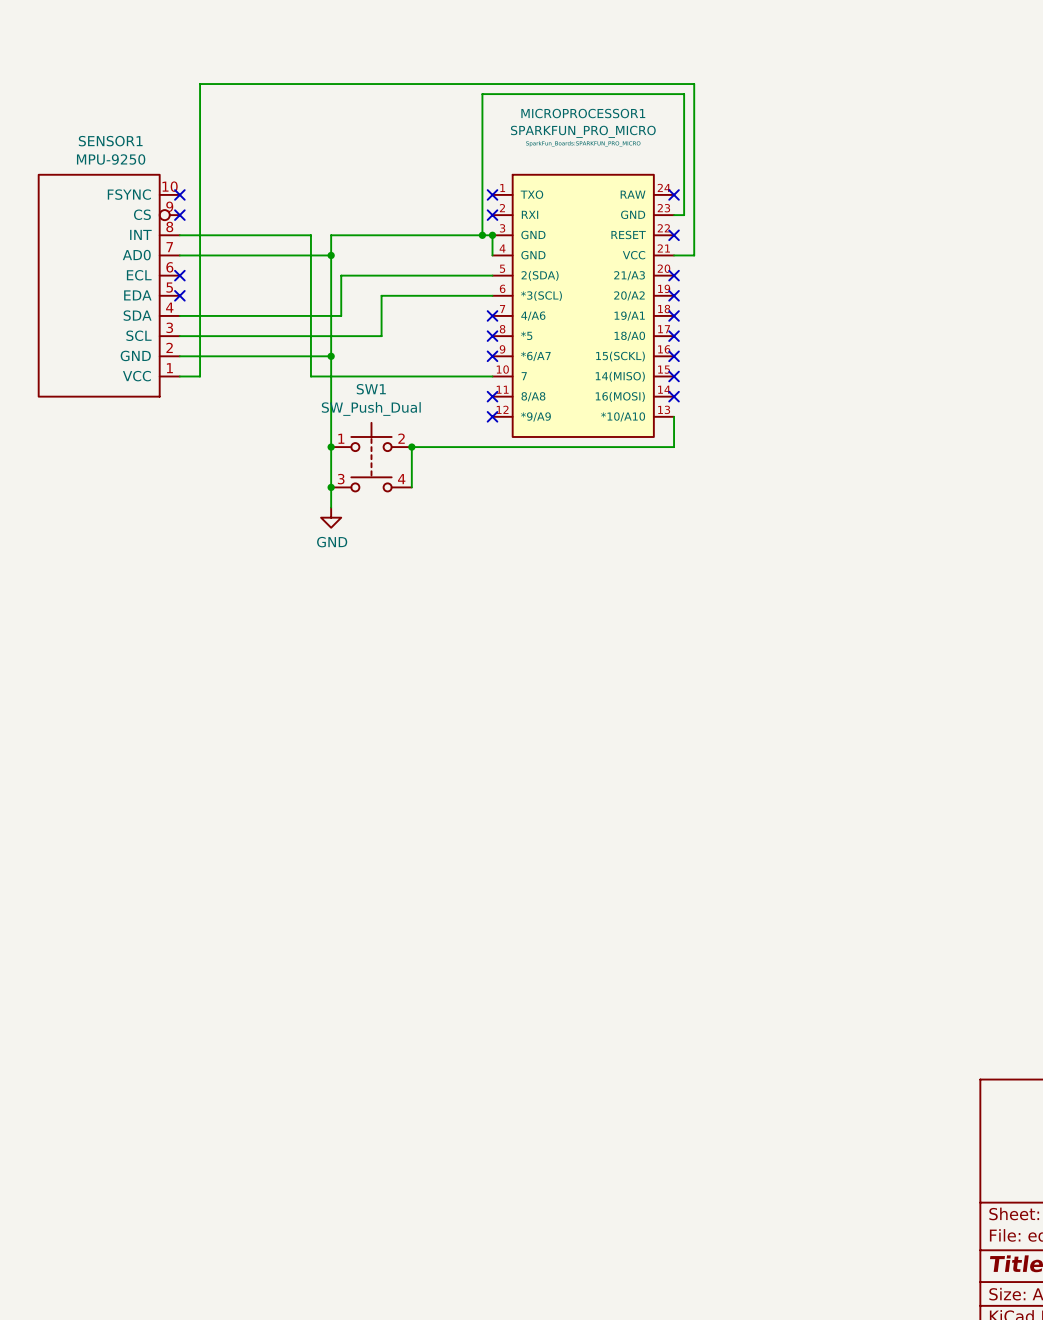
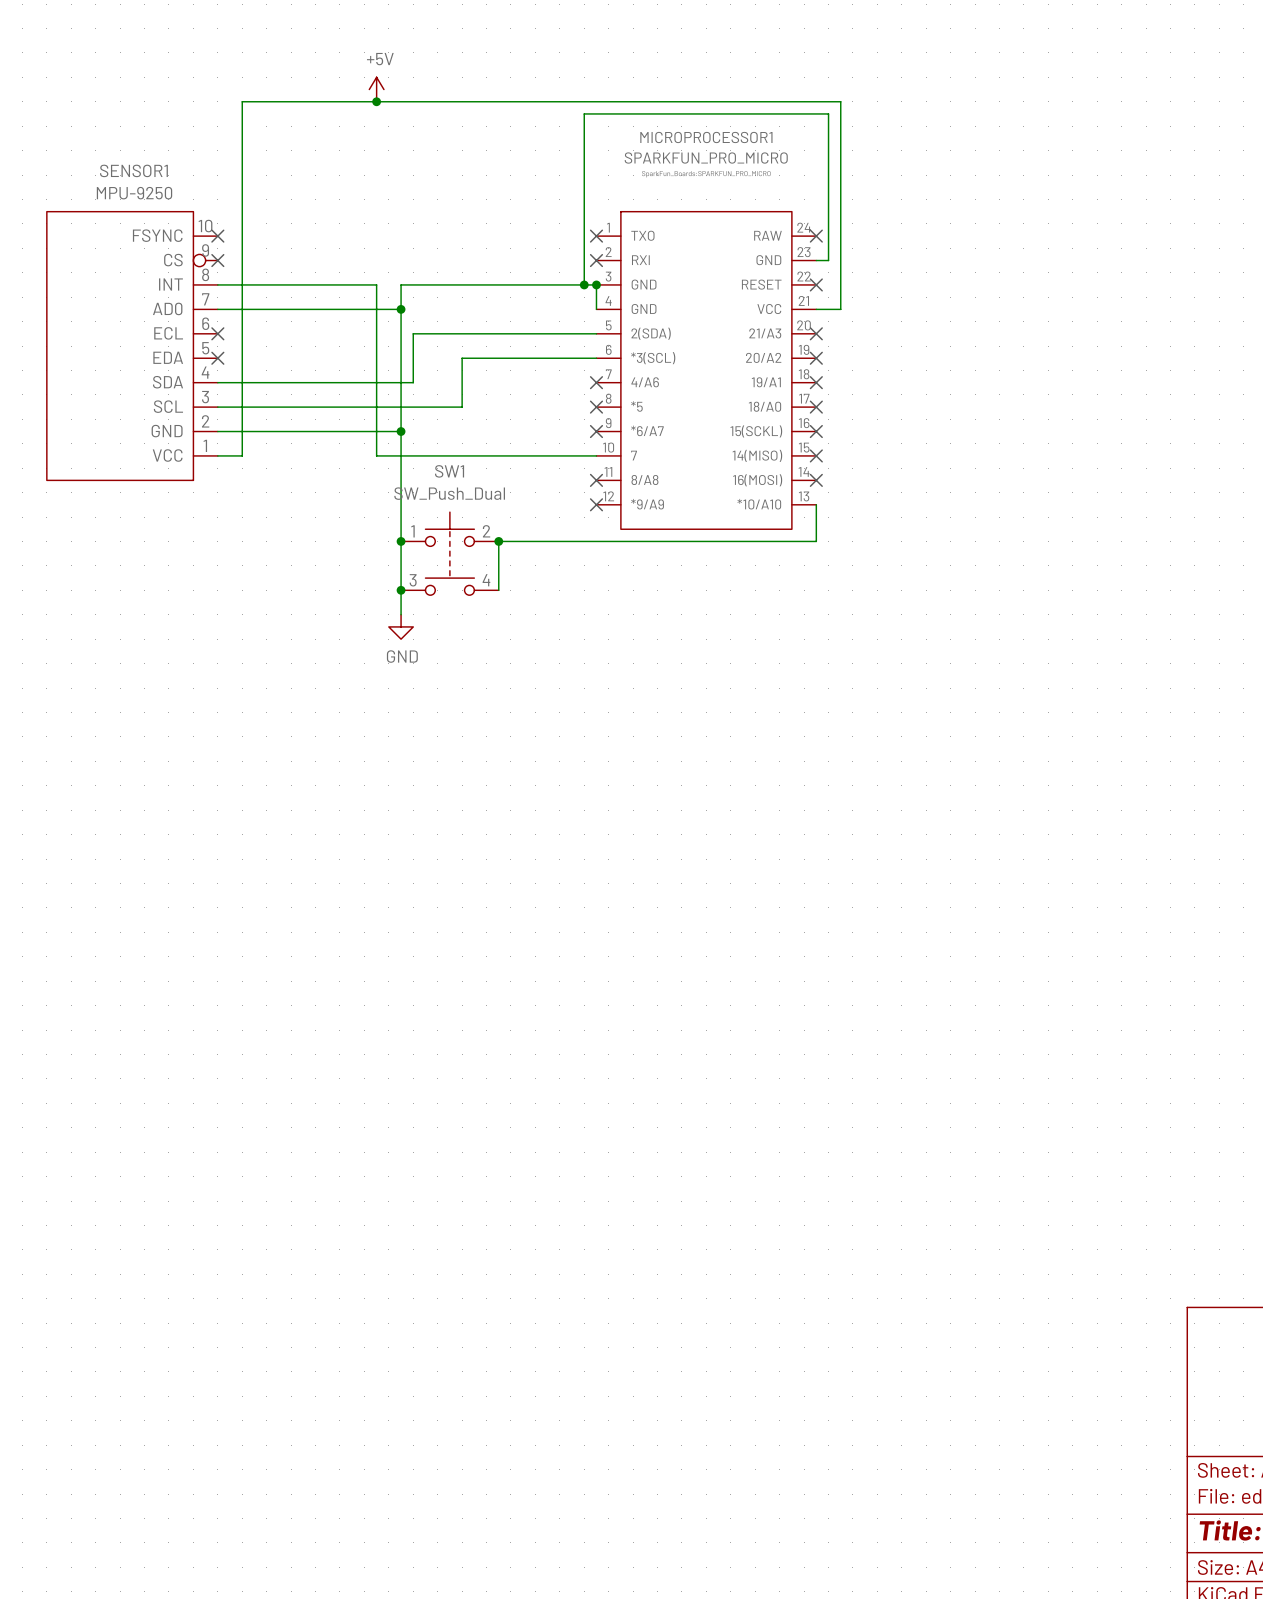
power symbol: none -> +5V (376, 89)
junction: none -> (376, 101)

